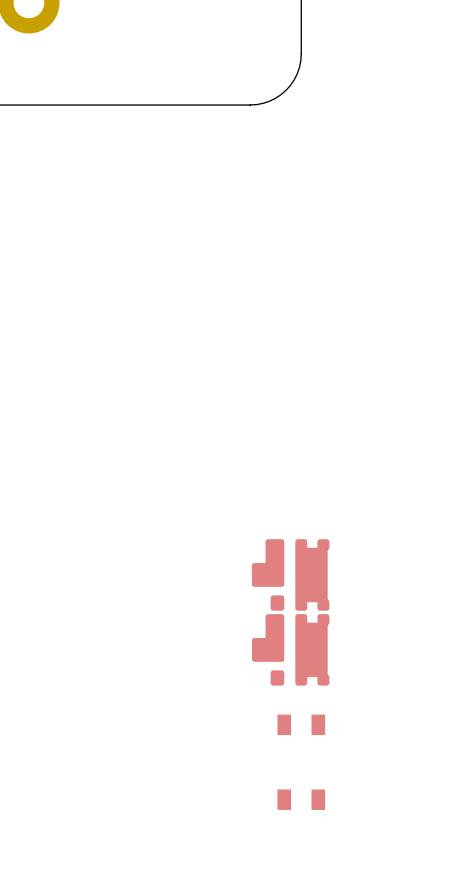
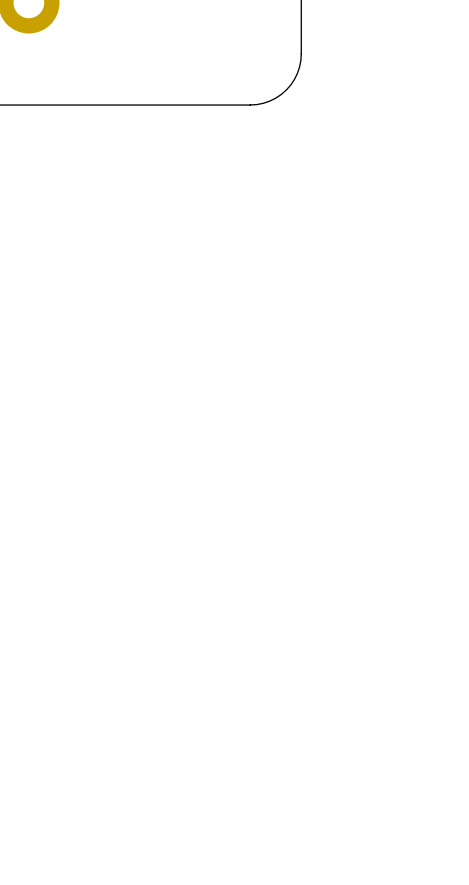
part: (290, 574) -> none
part: (290, 649) -> none
part: (301, 724) -> none
part: (301, 799) -> none

